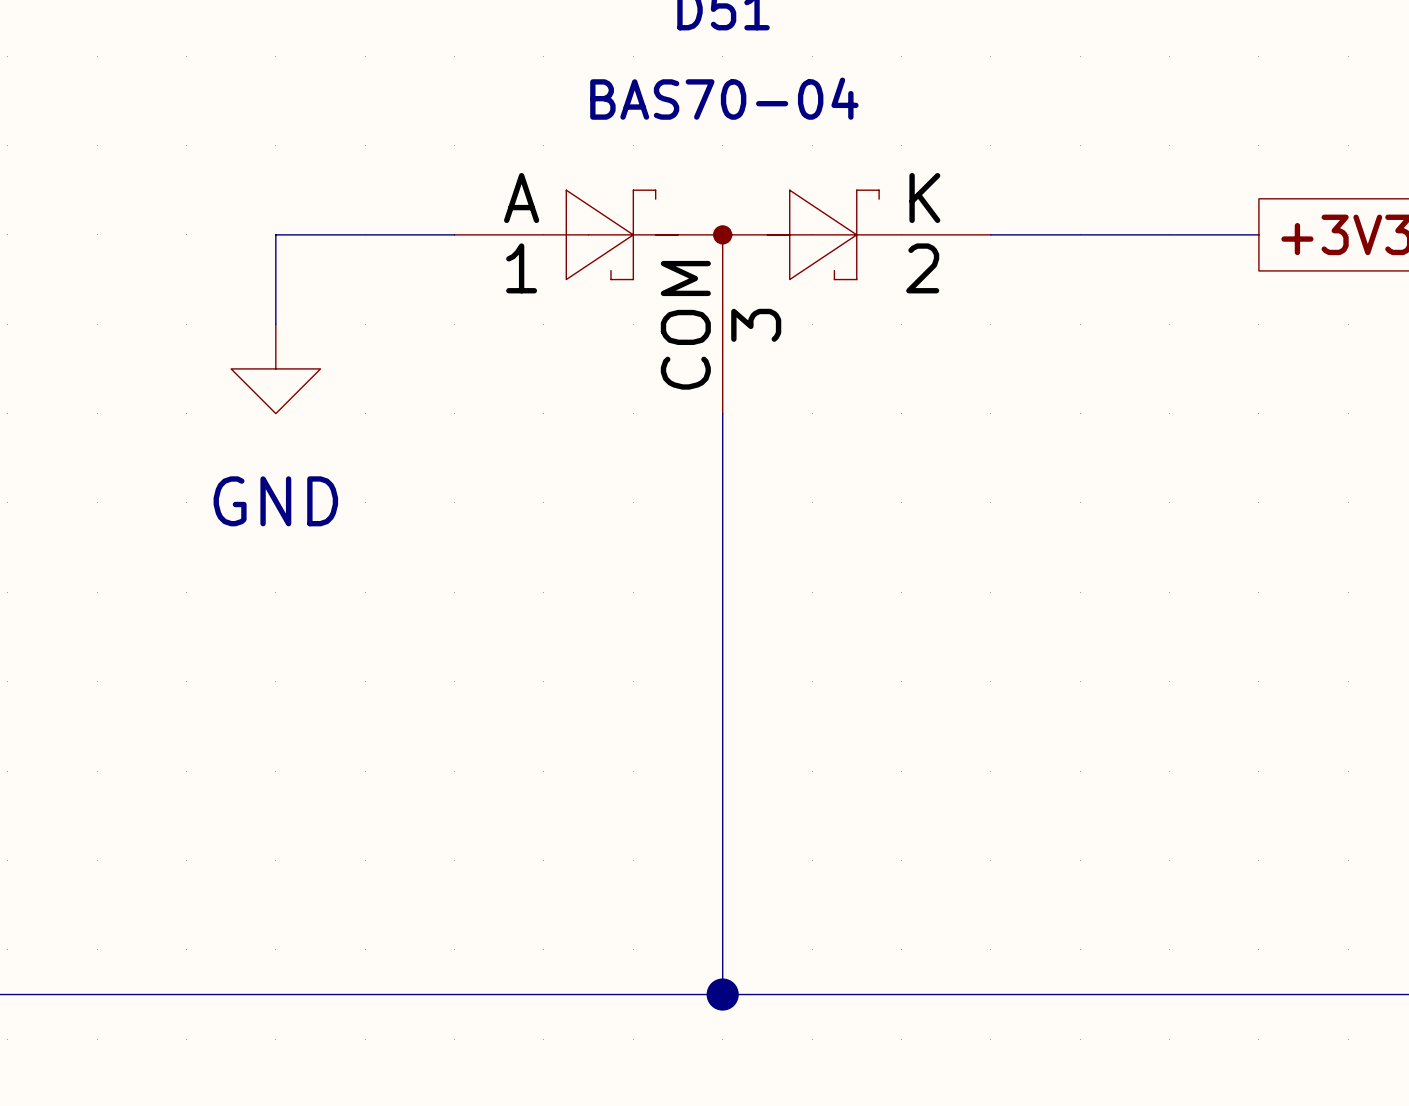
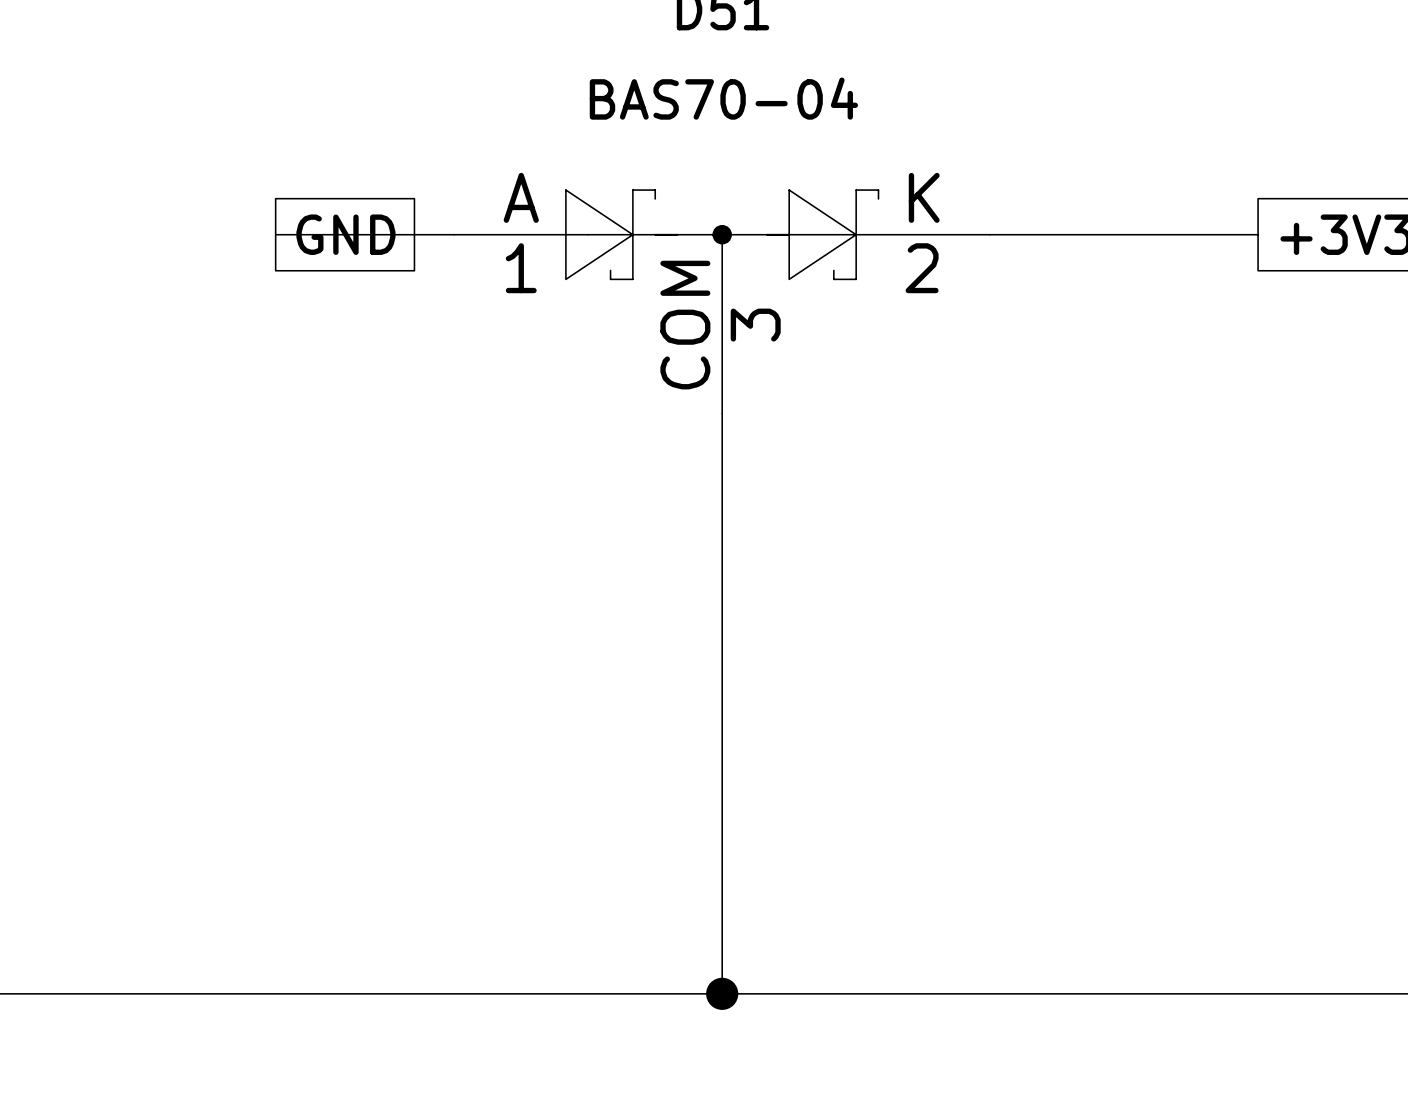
wire: (275, 234) (275, 324) -> none
global label: none -> GND (345, 234)
power symbol: GND (275, 368) -> none

